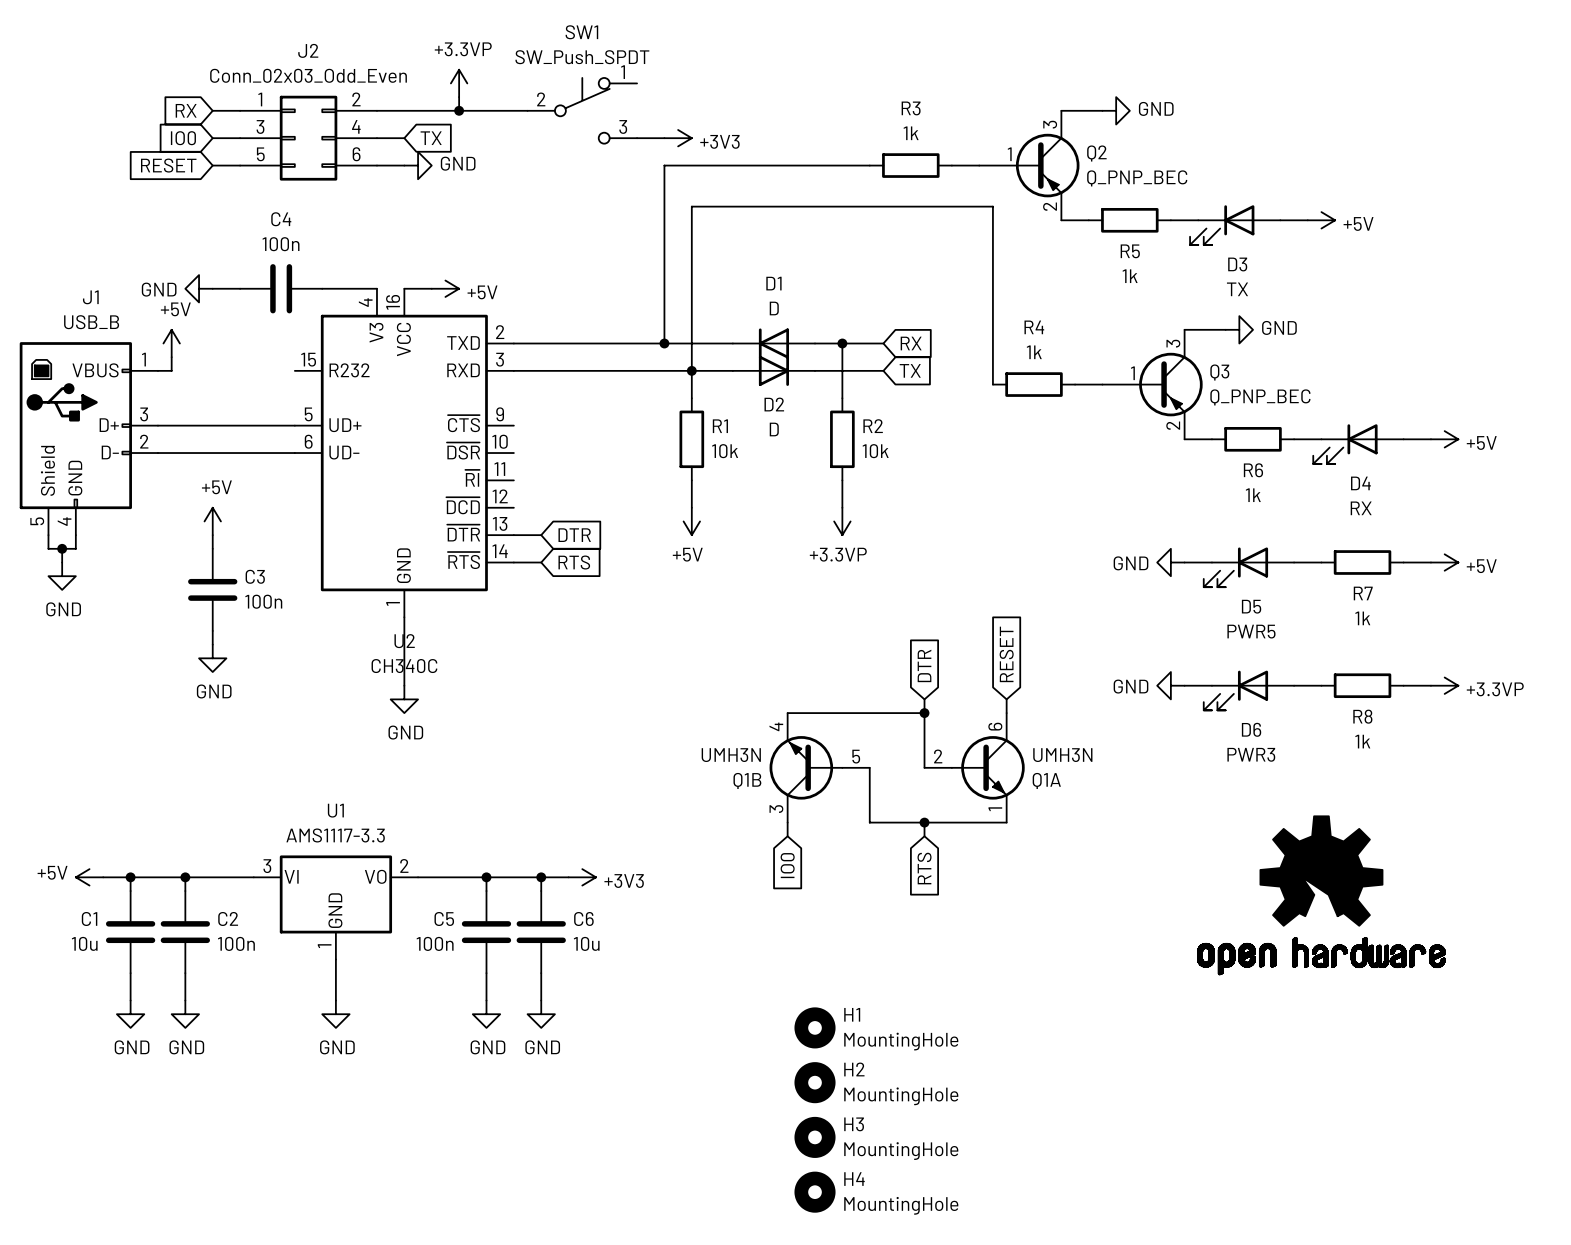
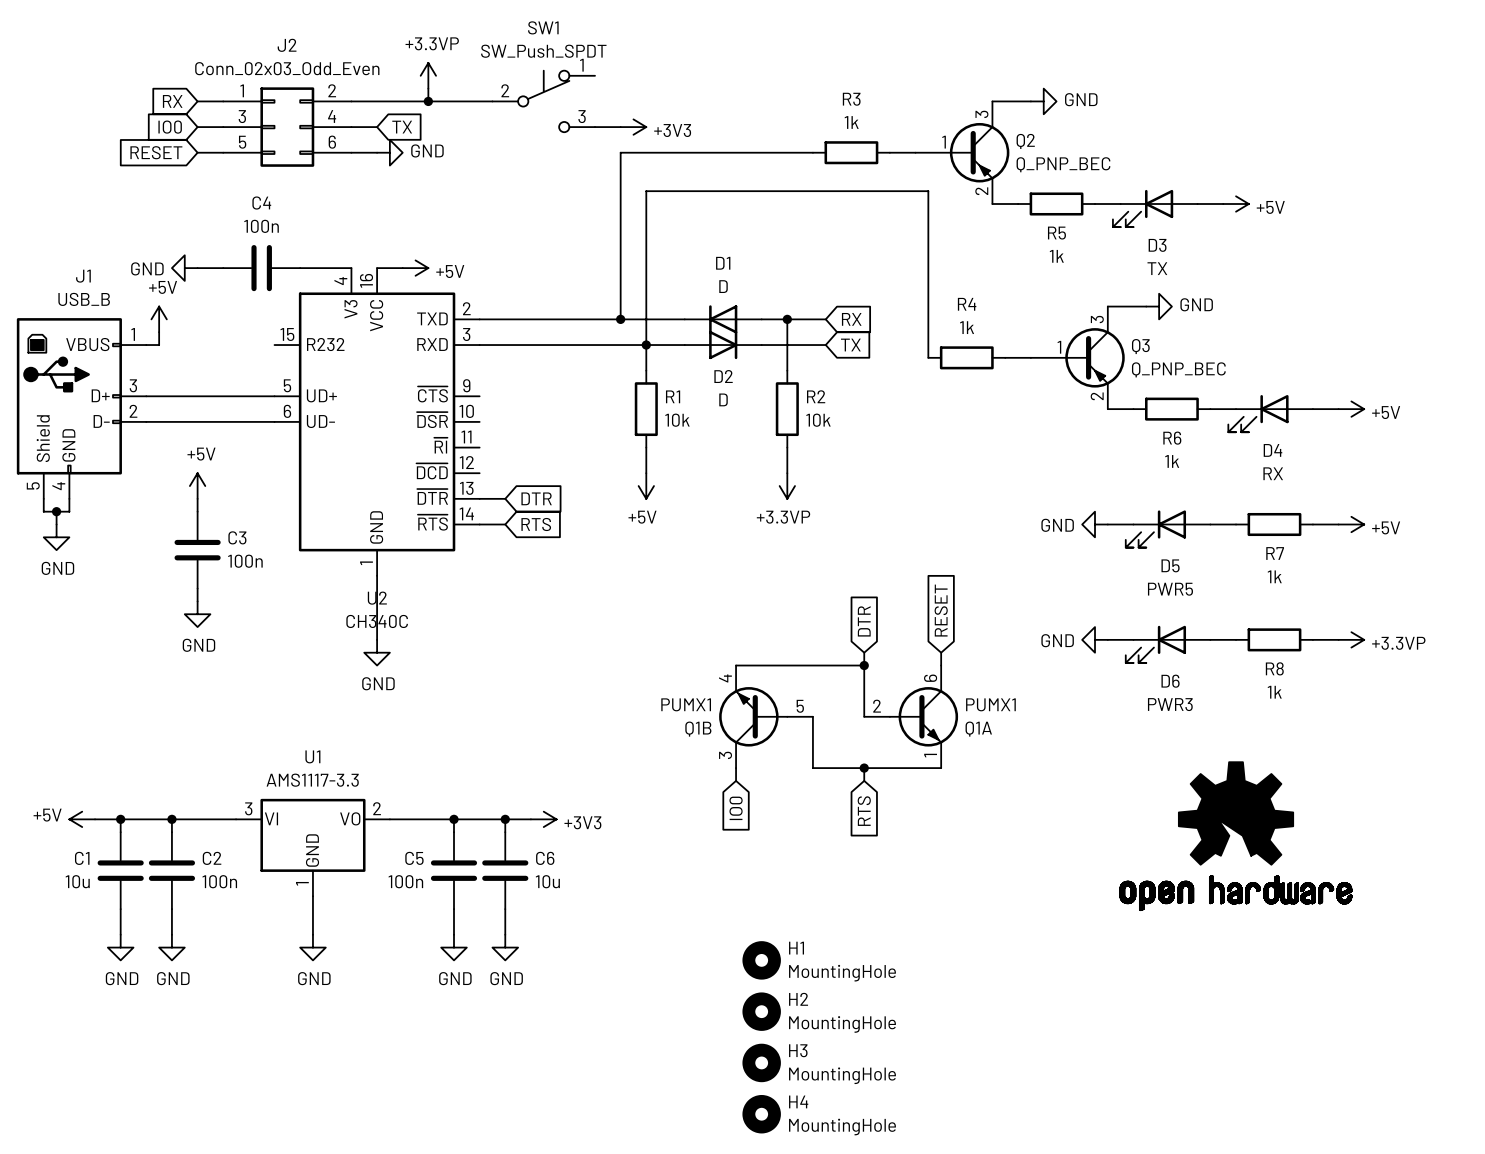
Q1B value: UMH3N (731, 755) -> PUMX1 (686, 704)
Q1A value: UMH3N (1062, 755) -> PUMX1 (990, 704)

